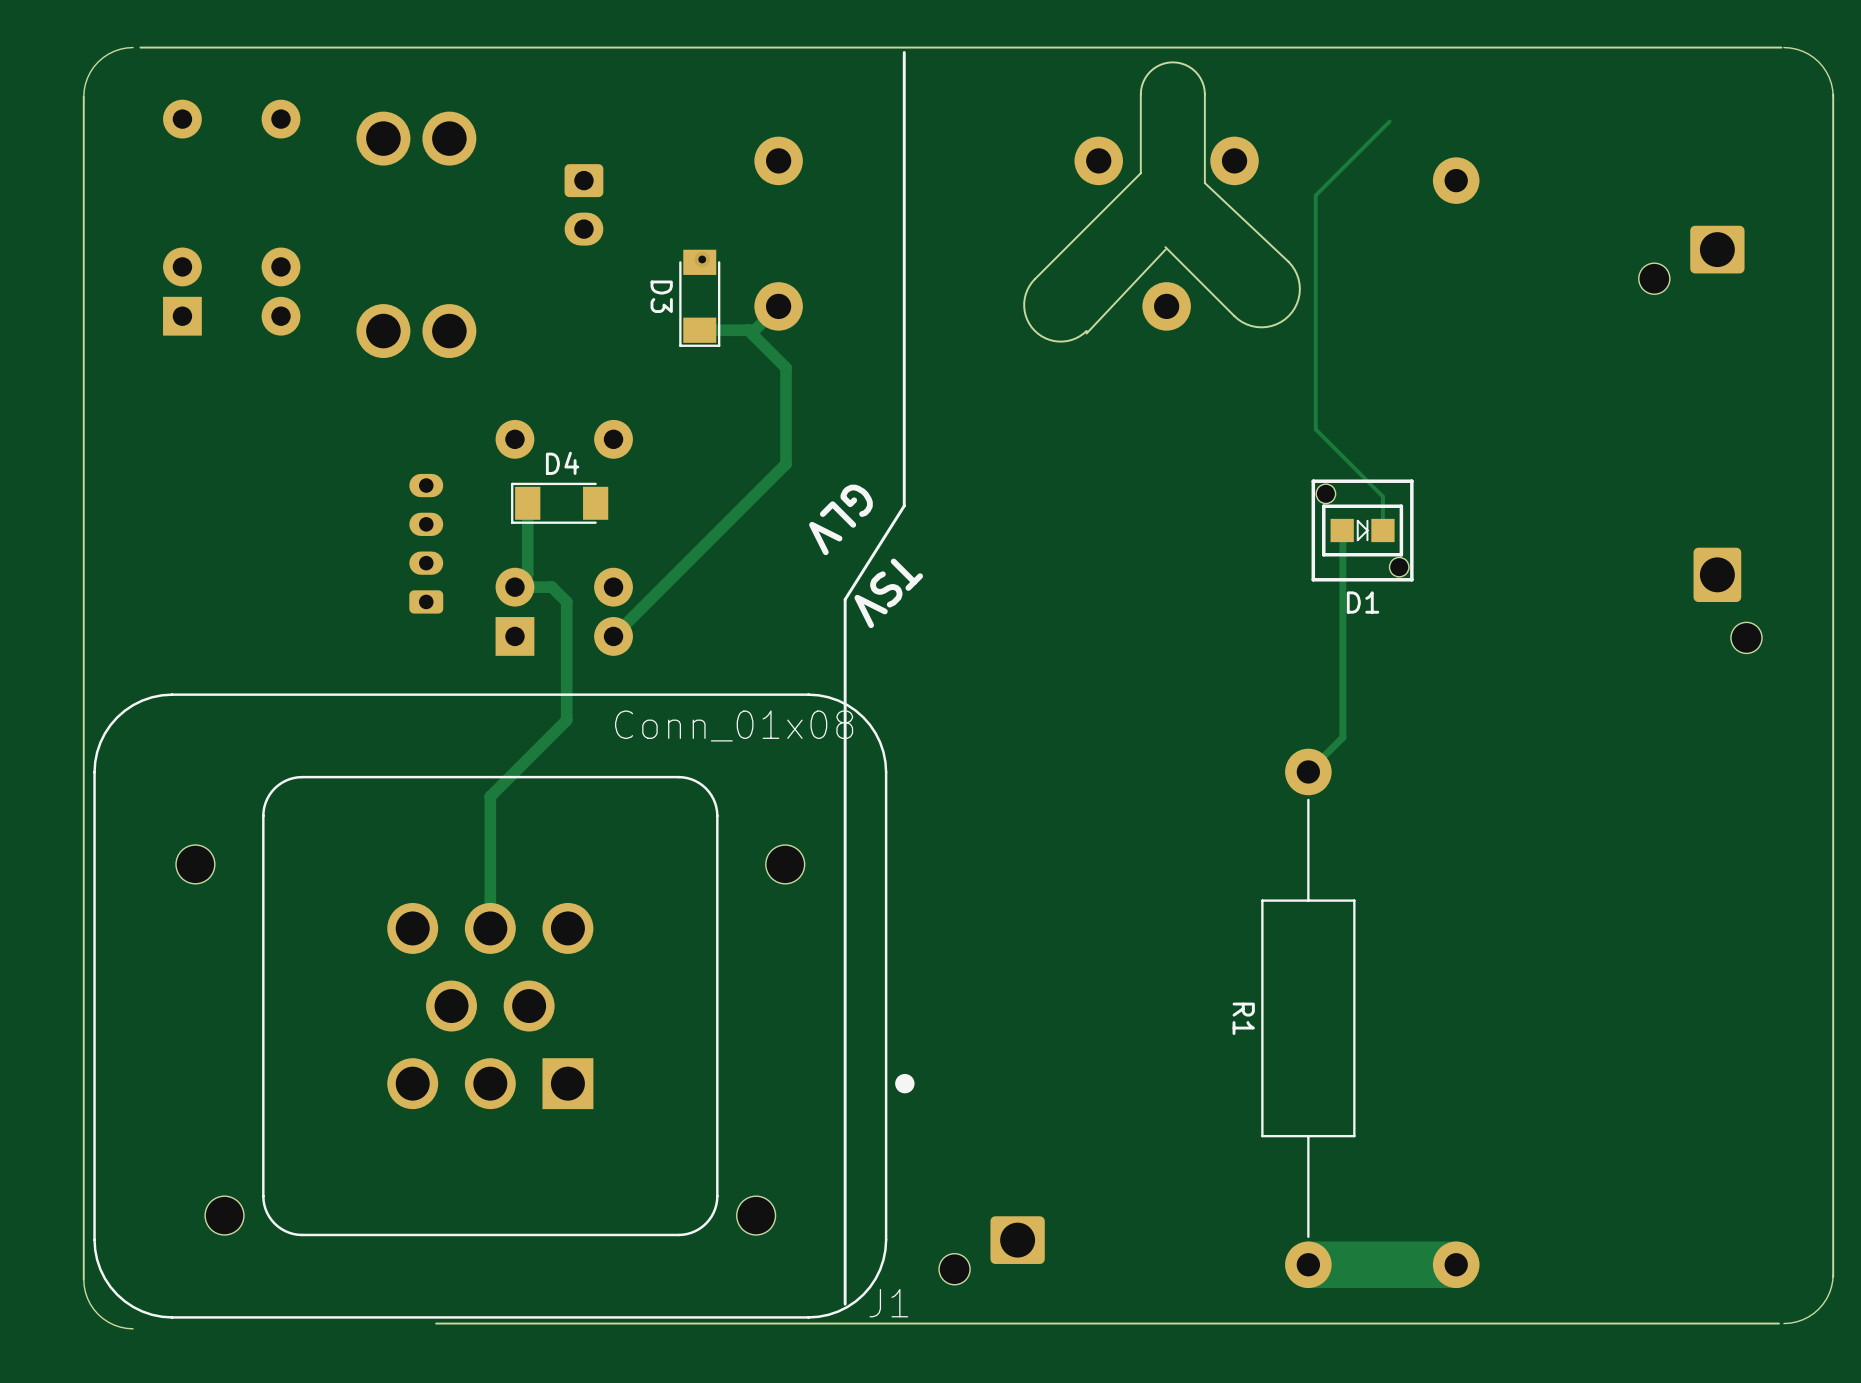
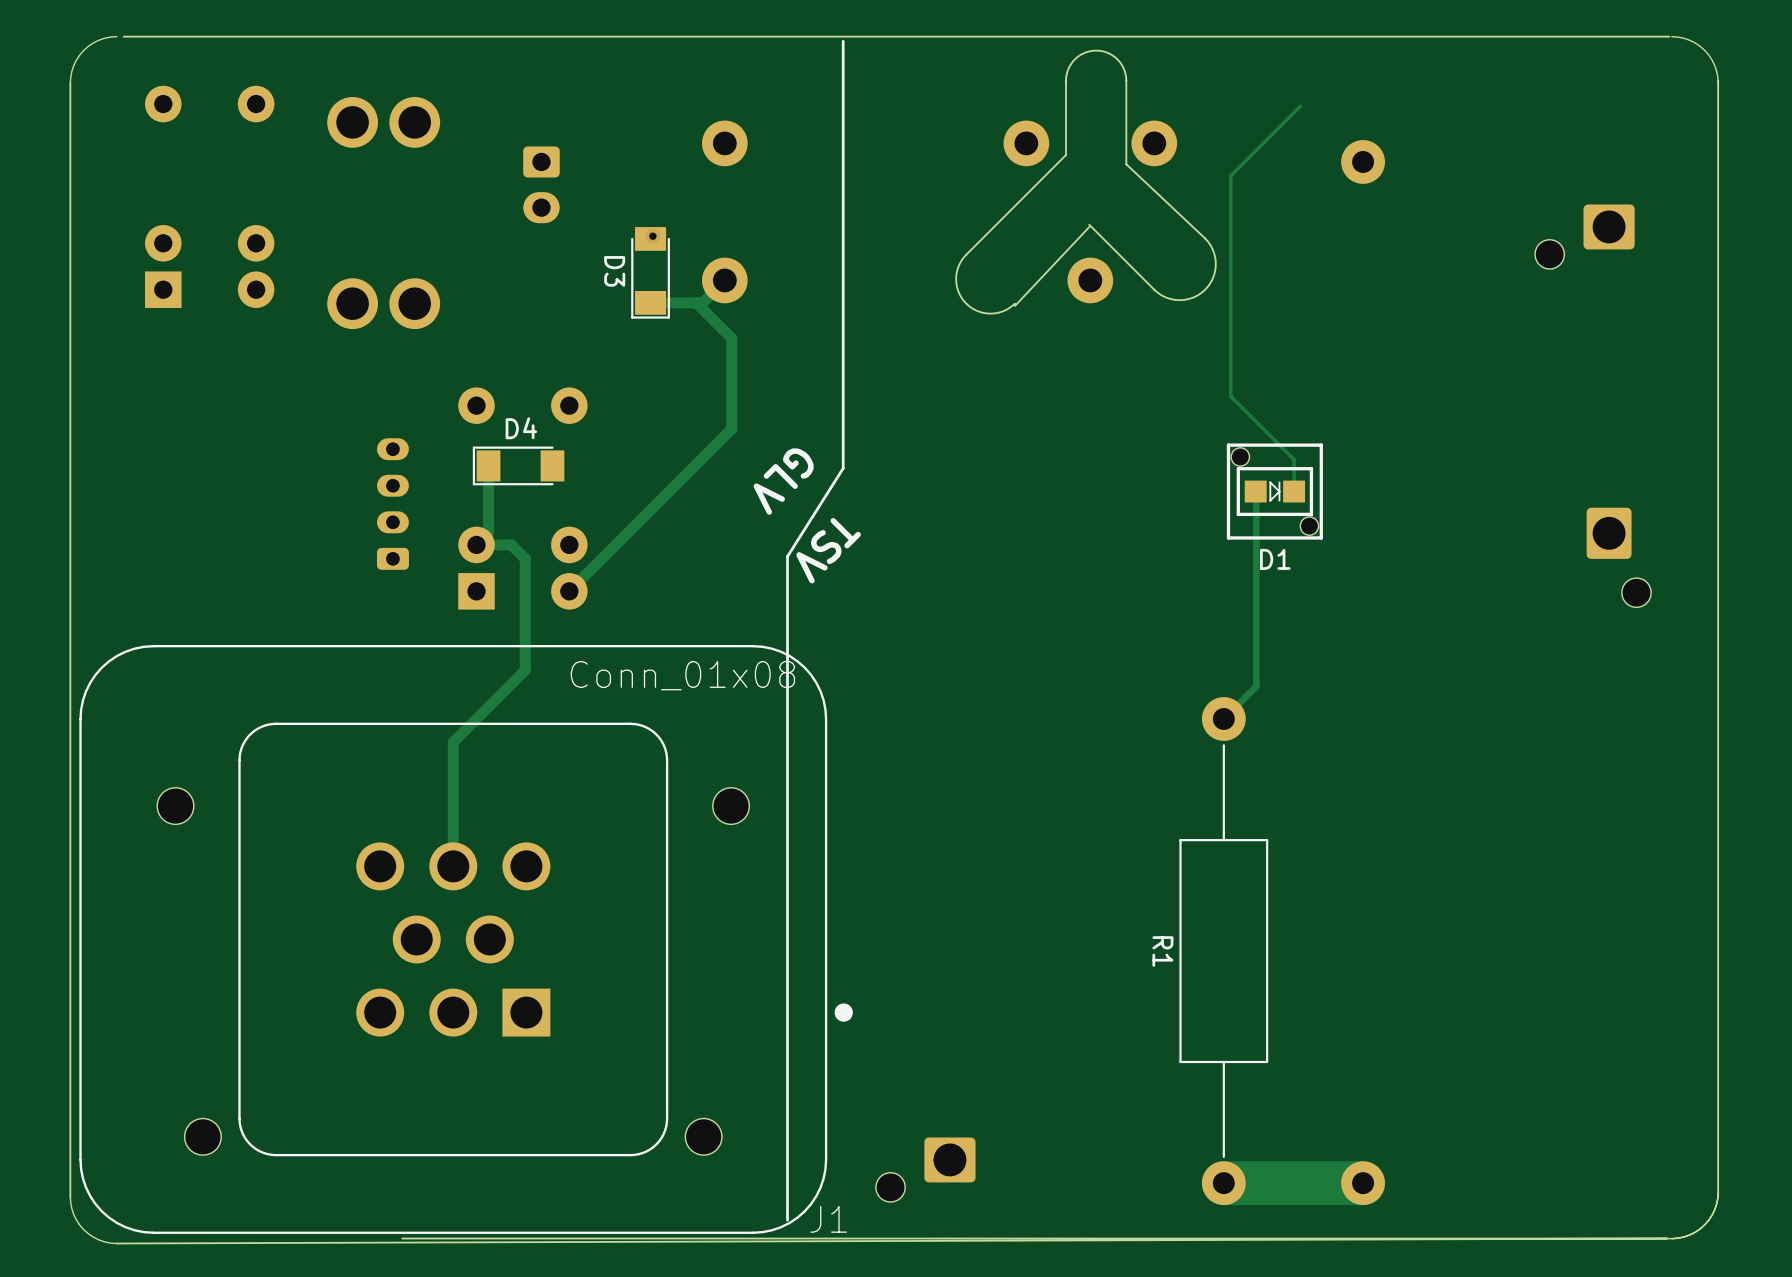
board edge: none -> (1718, 1194) (1712, 1215) (1701, 1227) (1688, 1235) (1672, 1238) (116, 1243)

